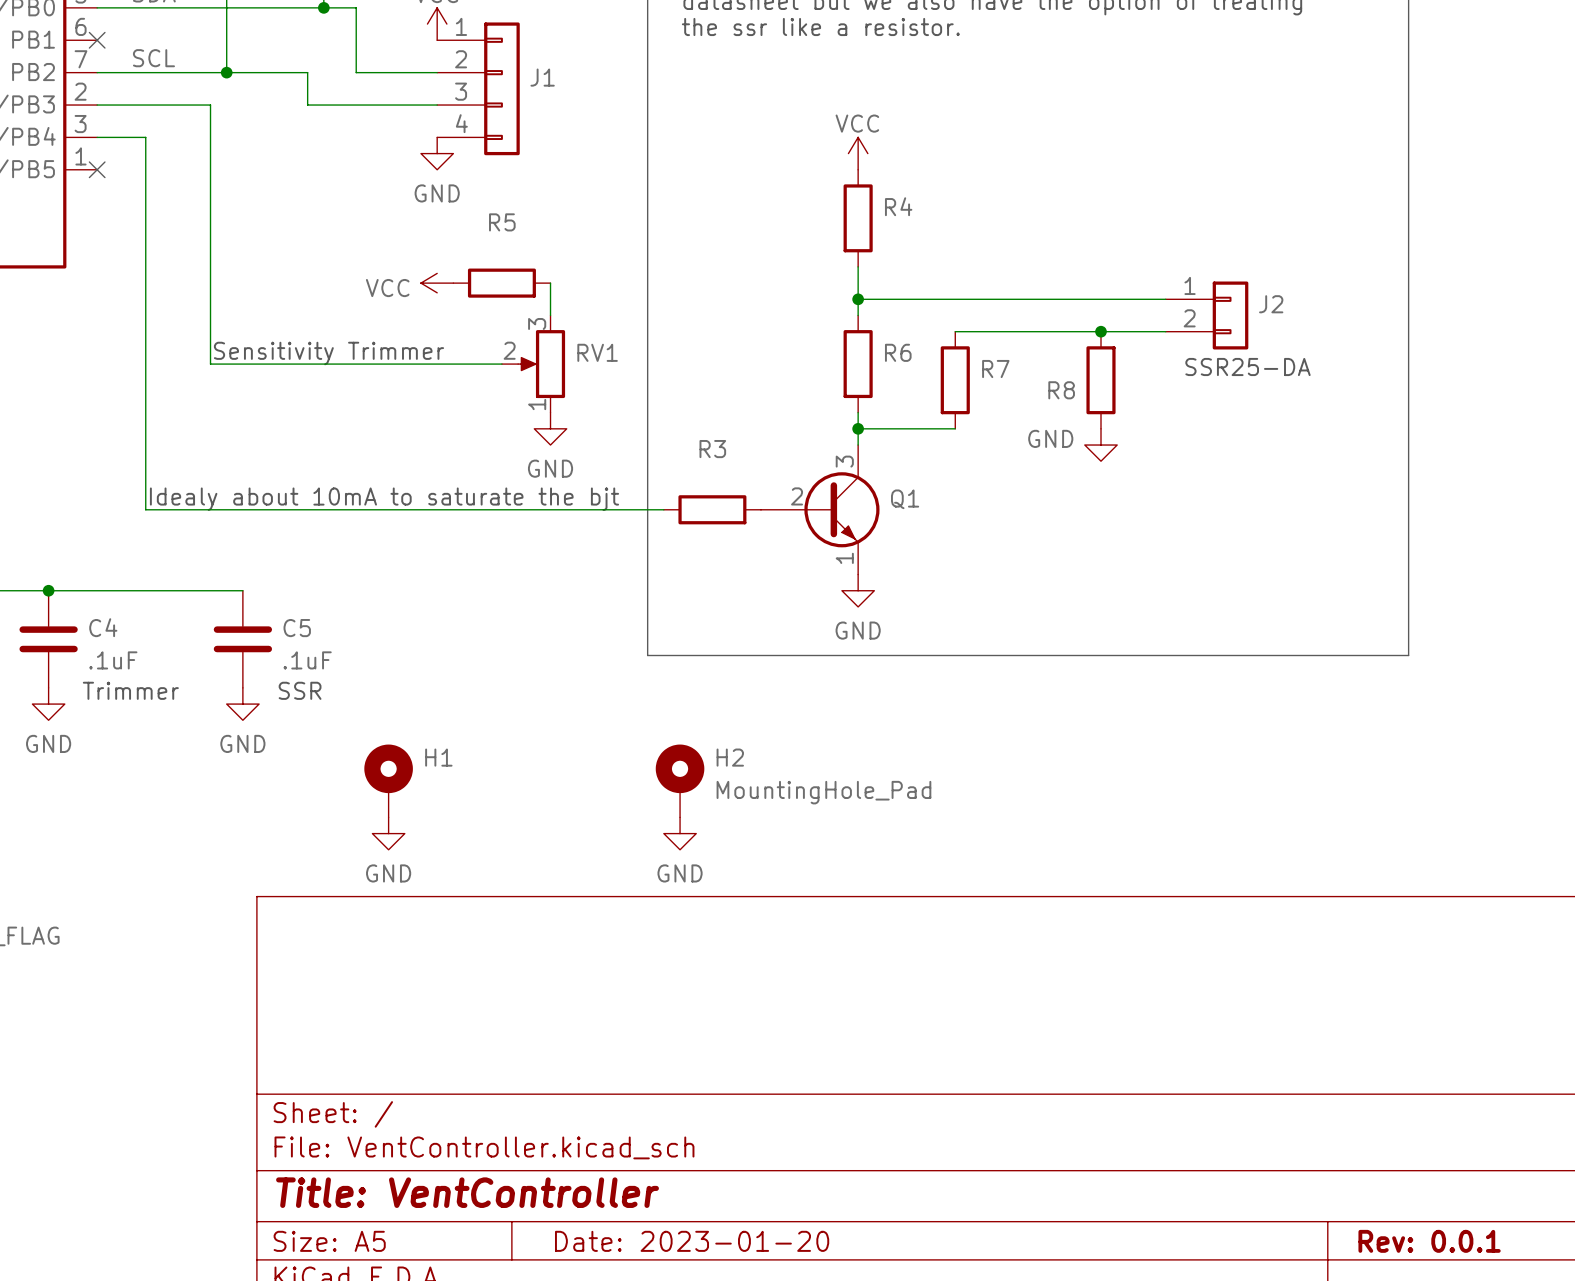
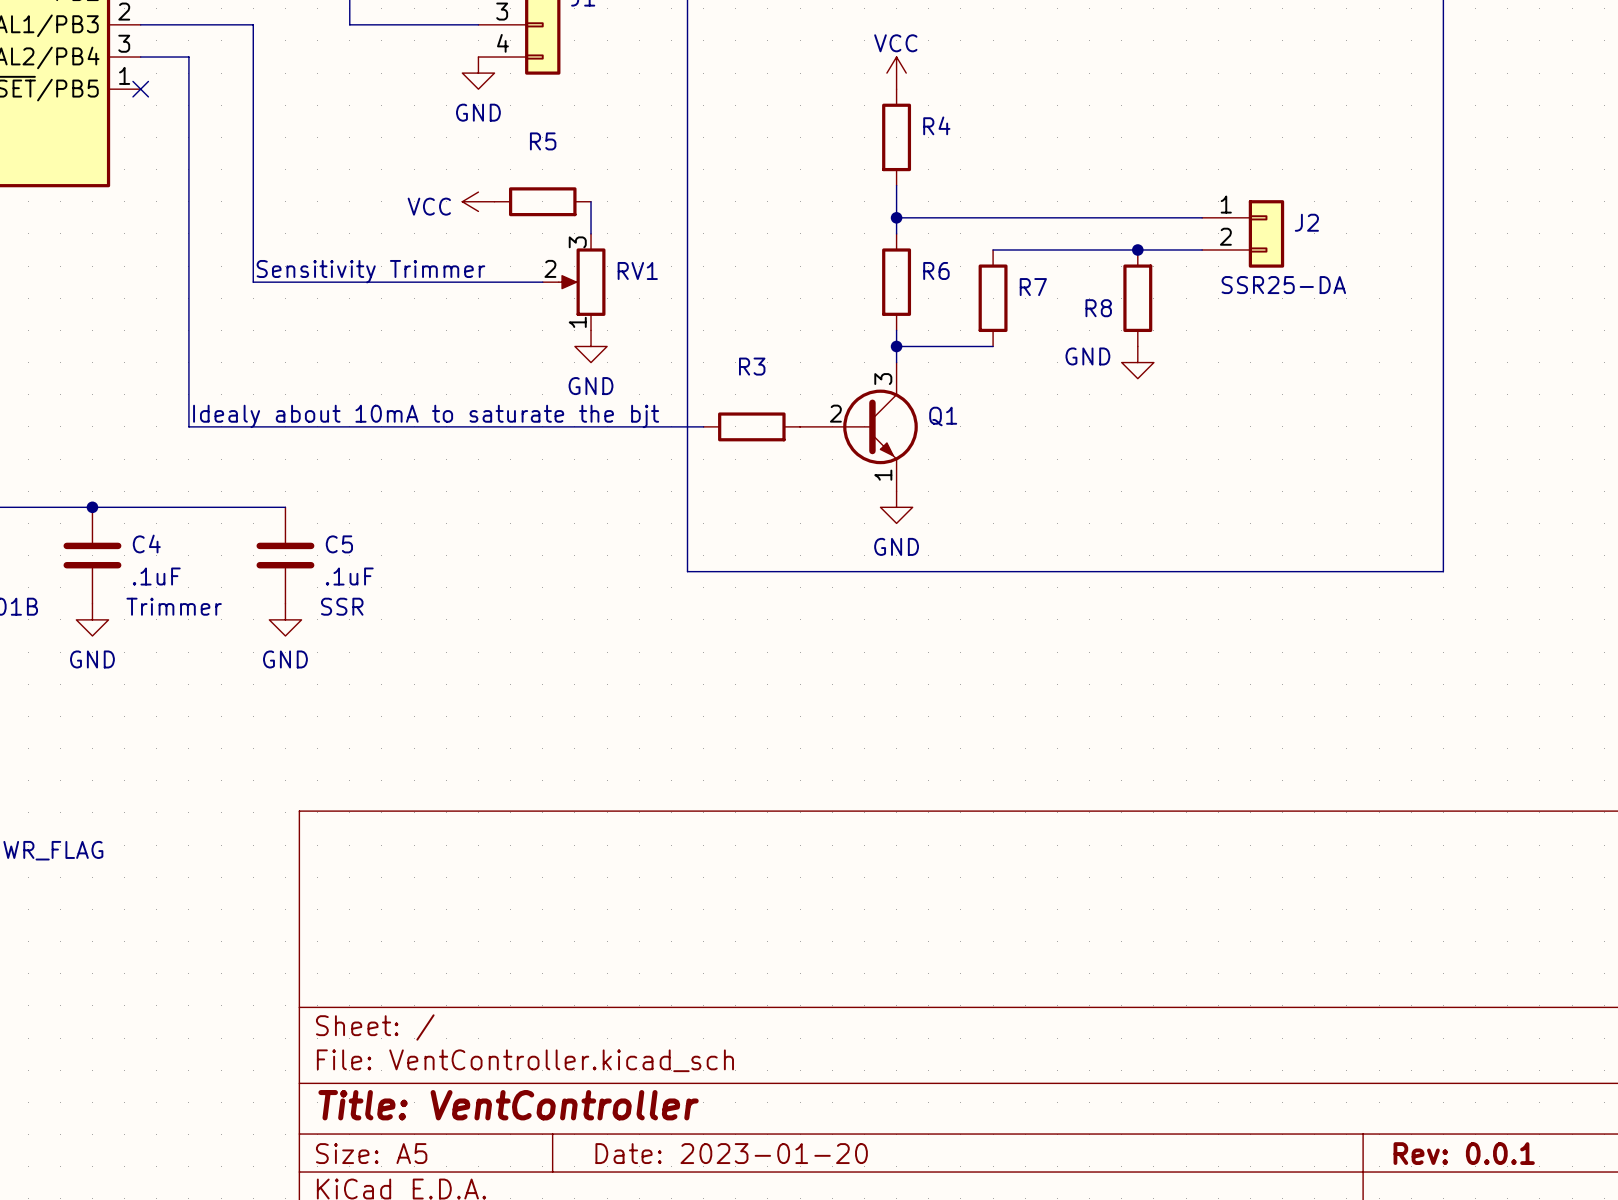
H1: (388, 780) -> none
H2: MountingHole_Pad (680, 780) -> none
power symbol: GND (388, 833) -> none
power symbol: GND (680, 833) -> none

